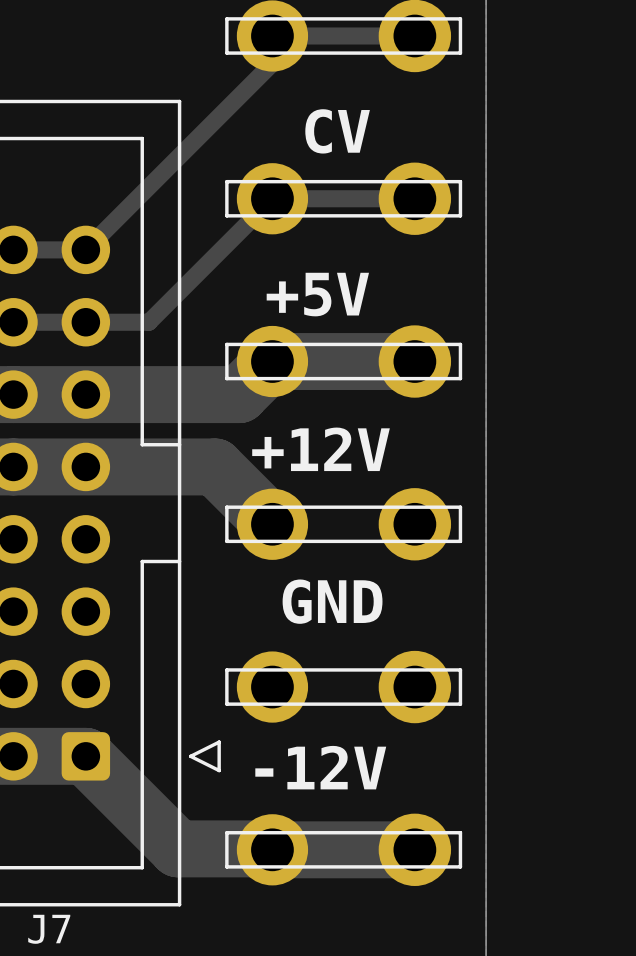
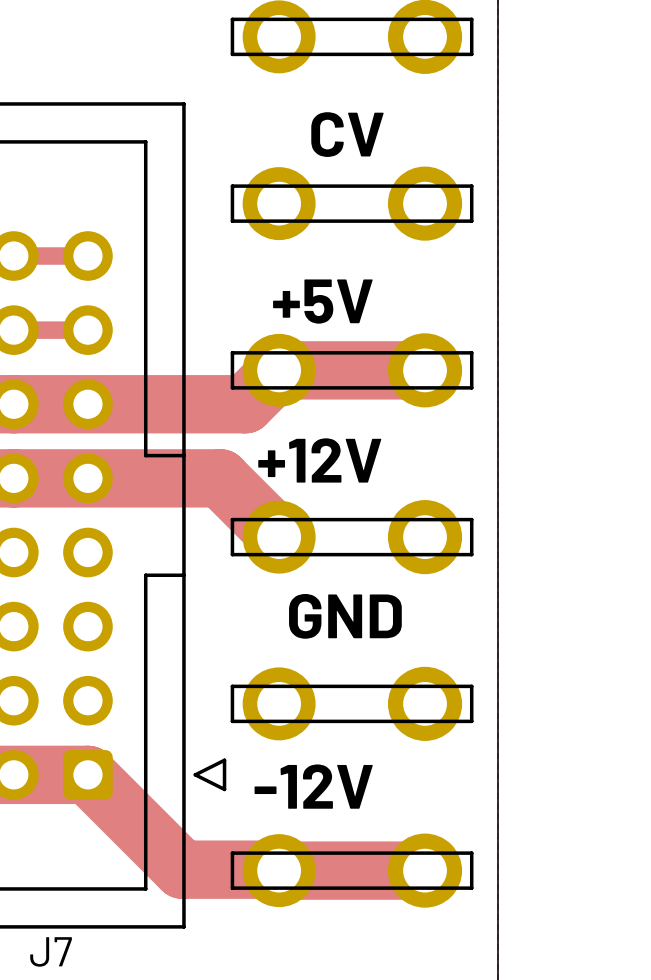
track: (414, 35) (272, 35) (272, 63) (85, 249) -> none
track: (414, 198) (272, 198) (148, 322) (85, 322) -> none

